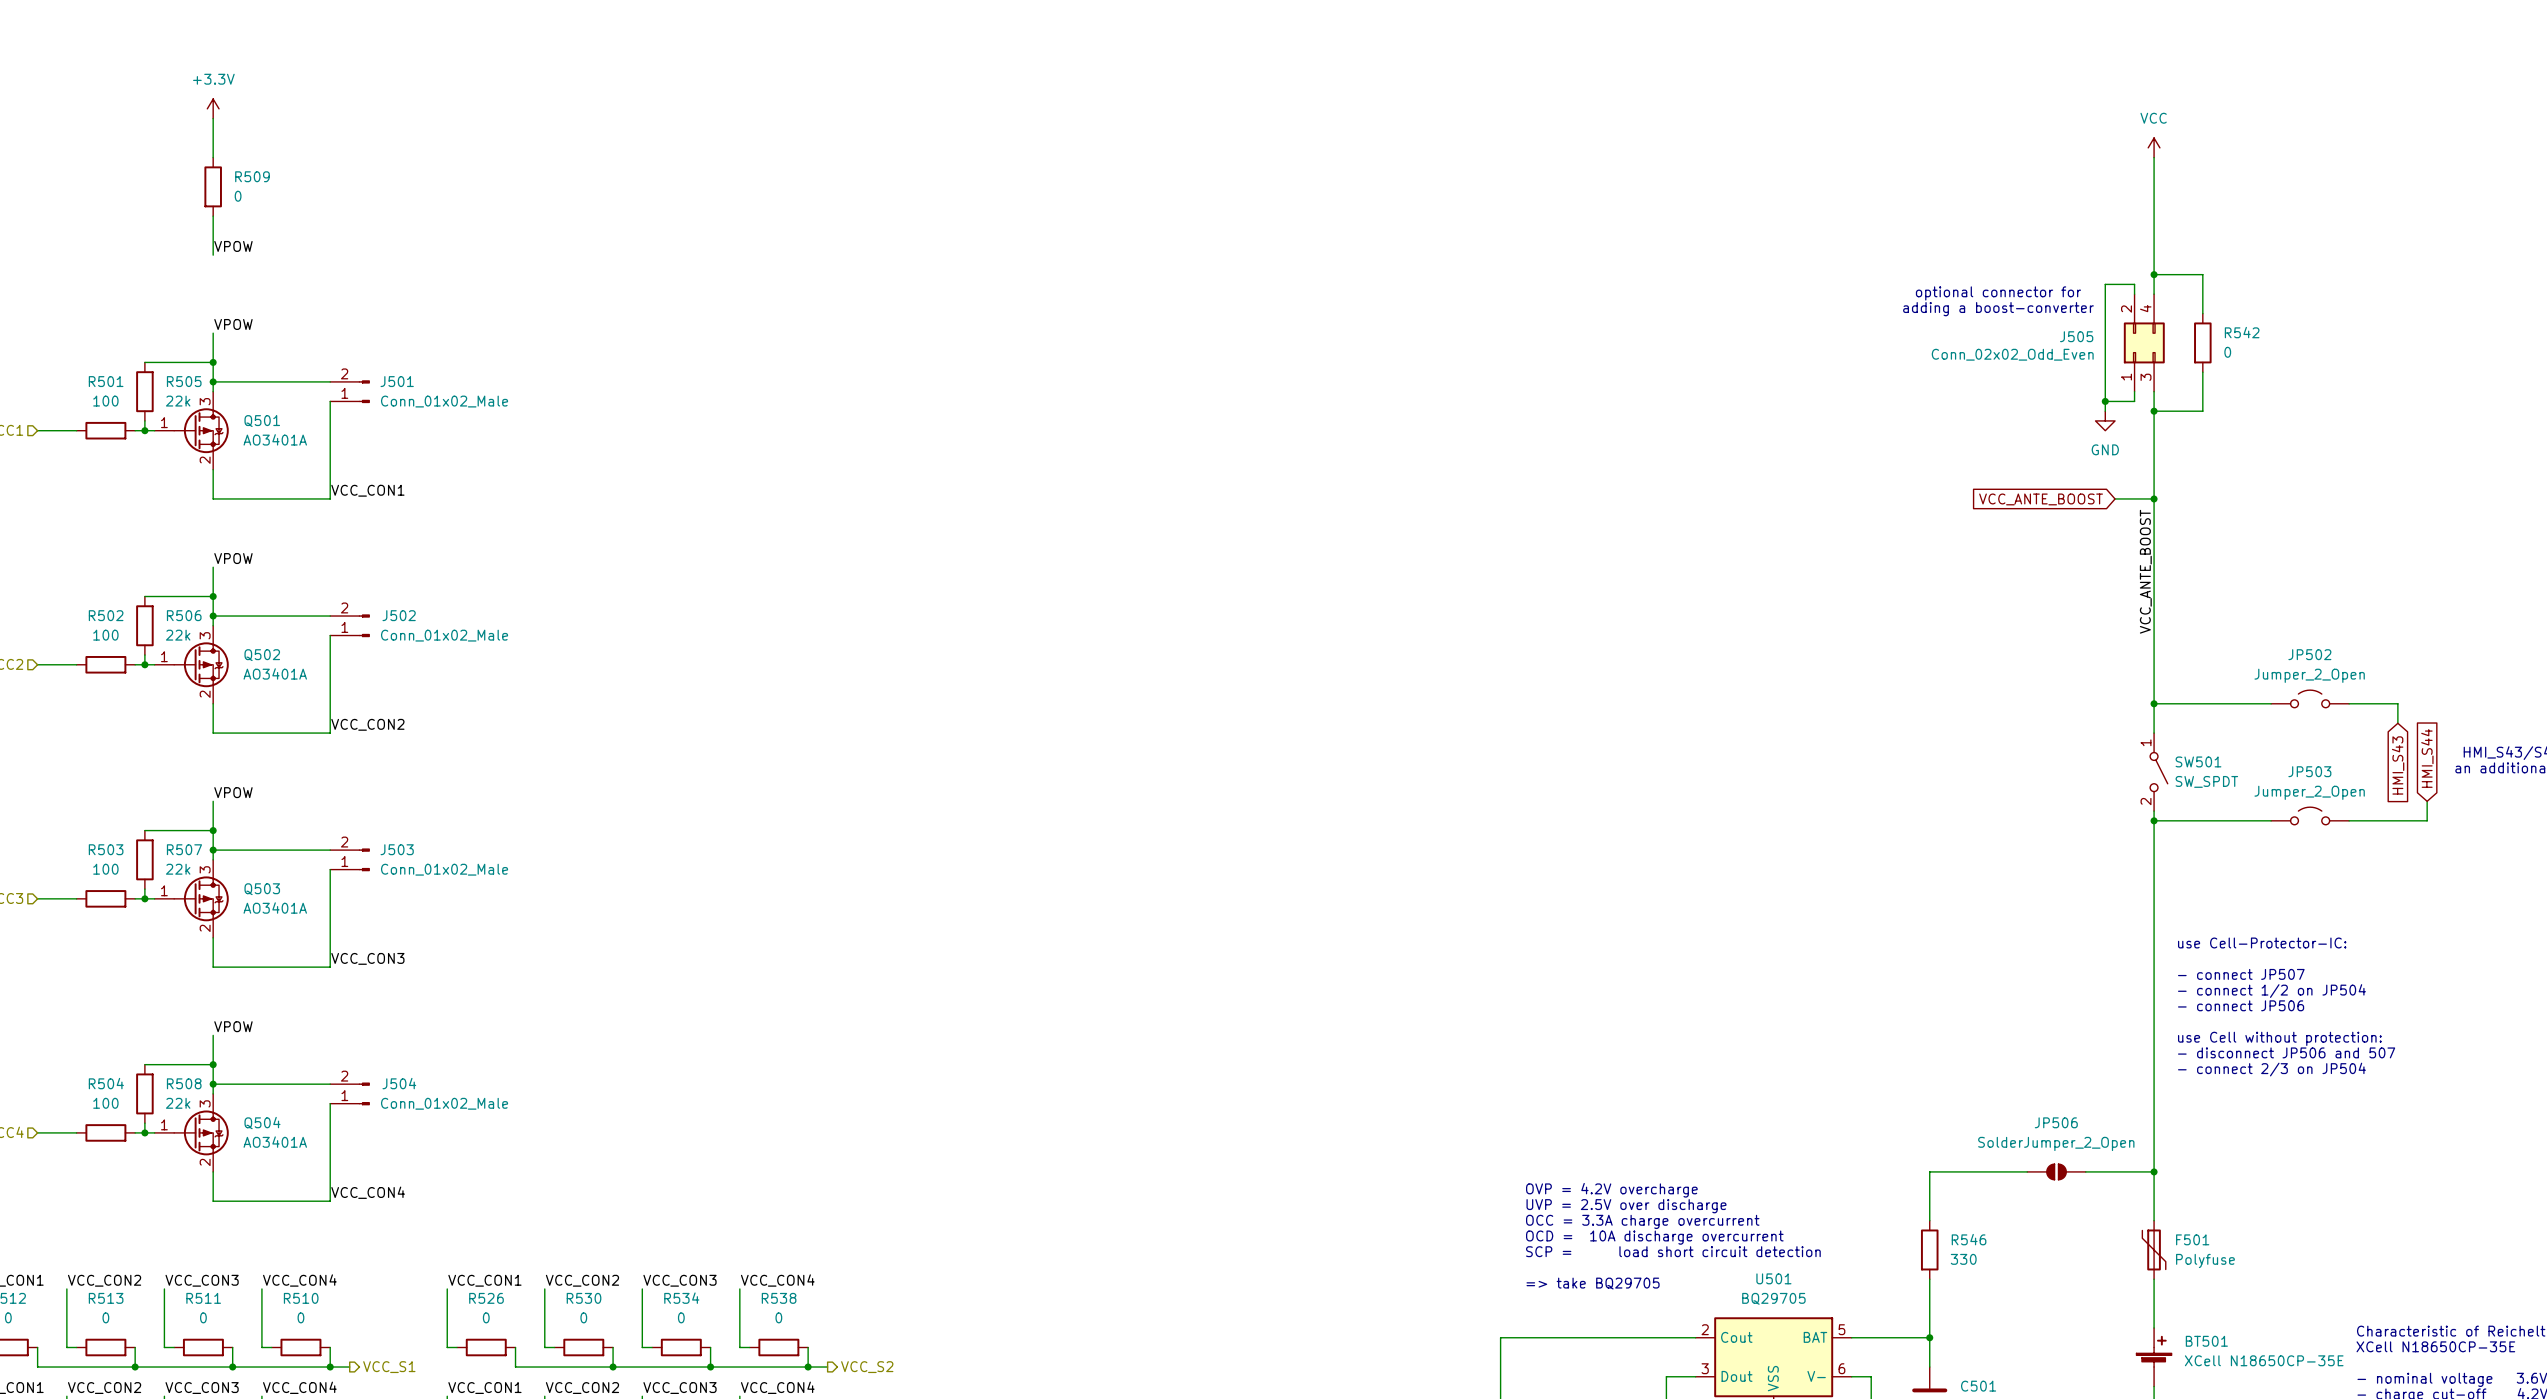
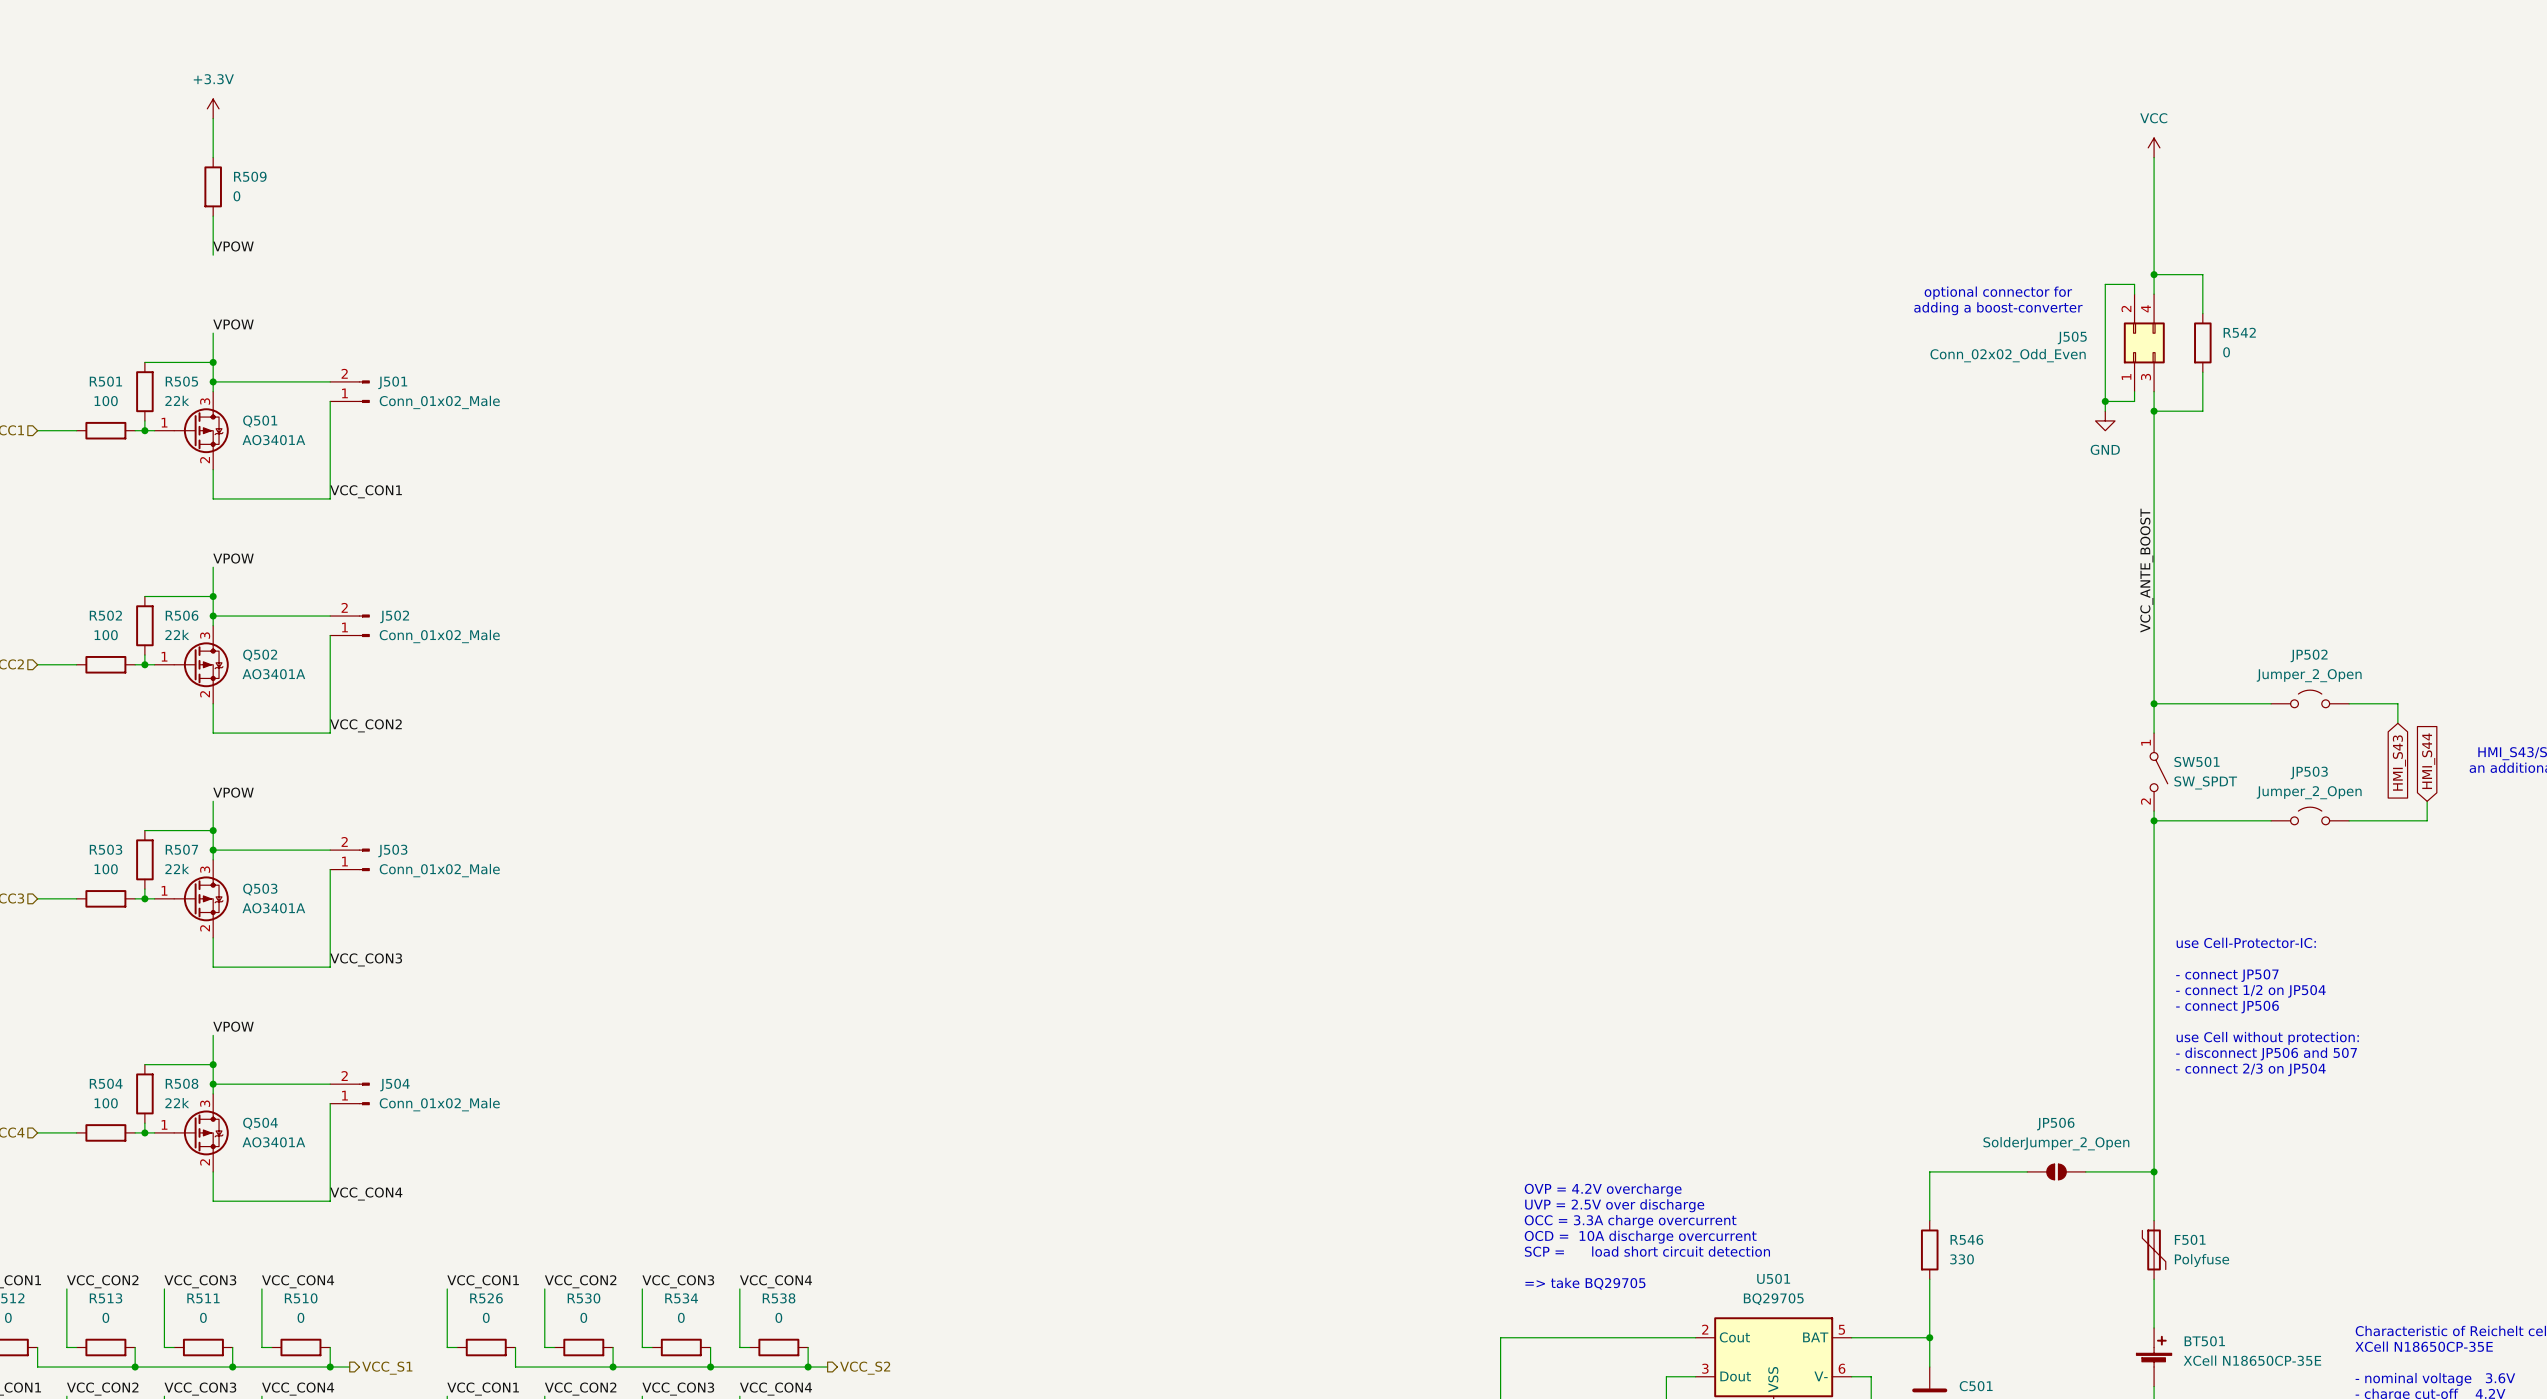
wire: (2115, 498) (2154, 498) -> none
junction: (2154, 498) -> none
global label: VCC_ANTE_BOOST (2041, 499) -> none

